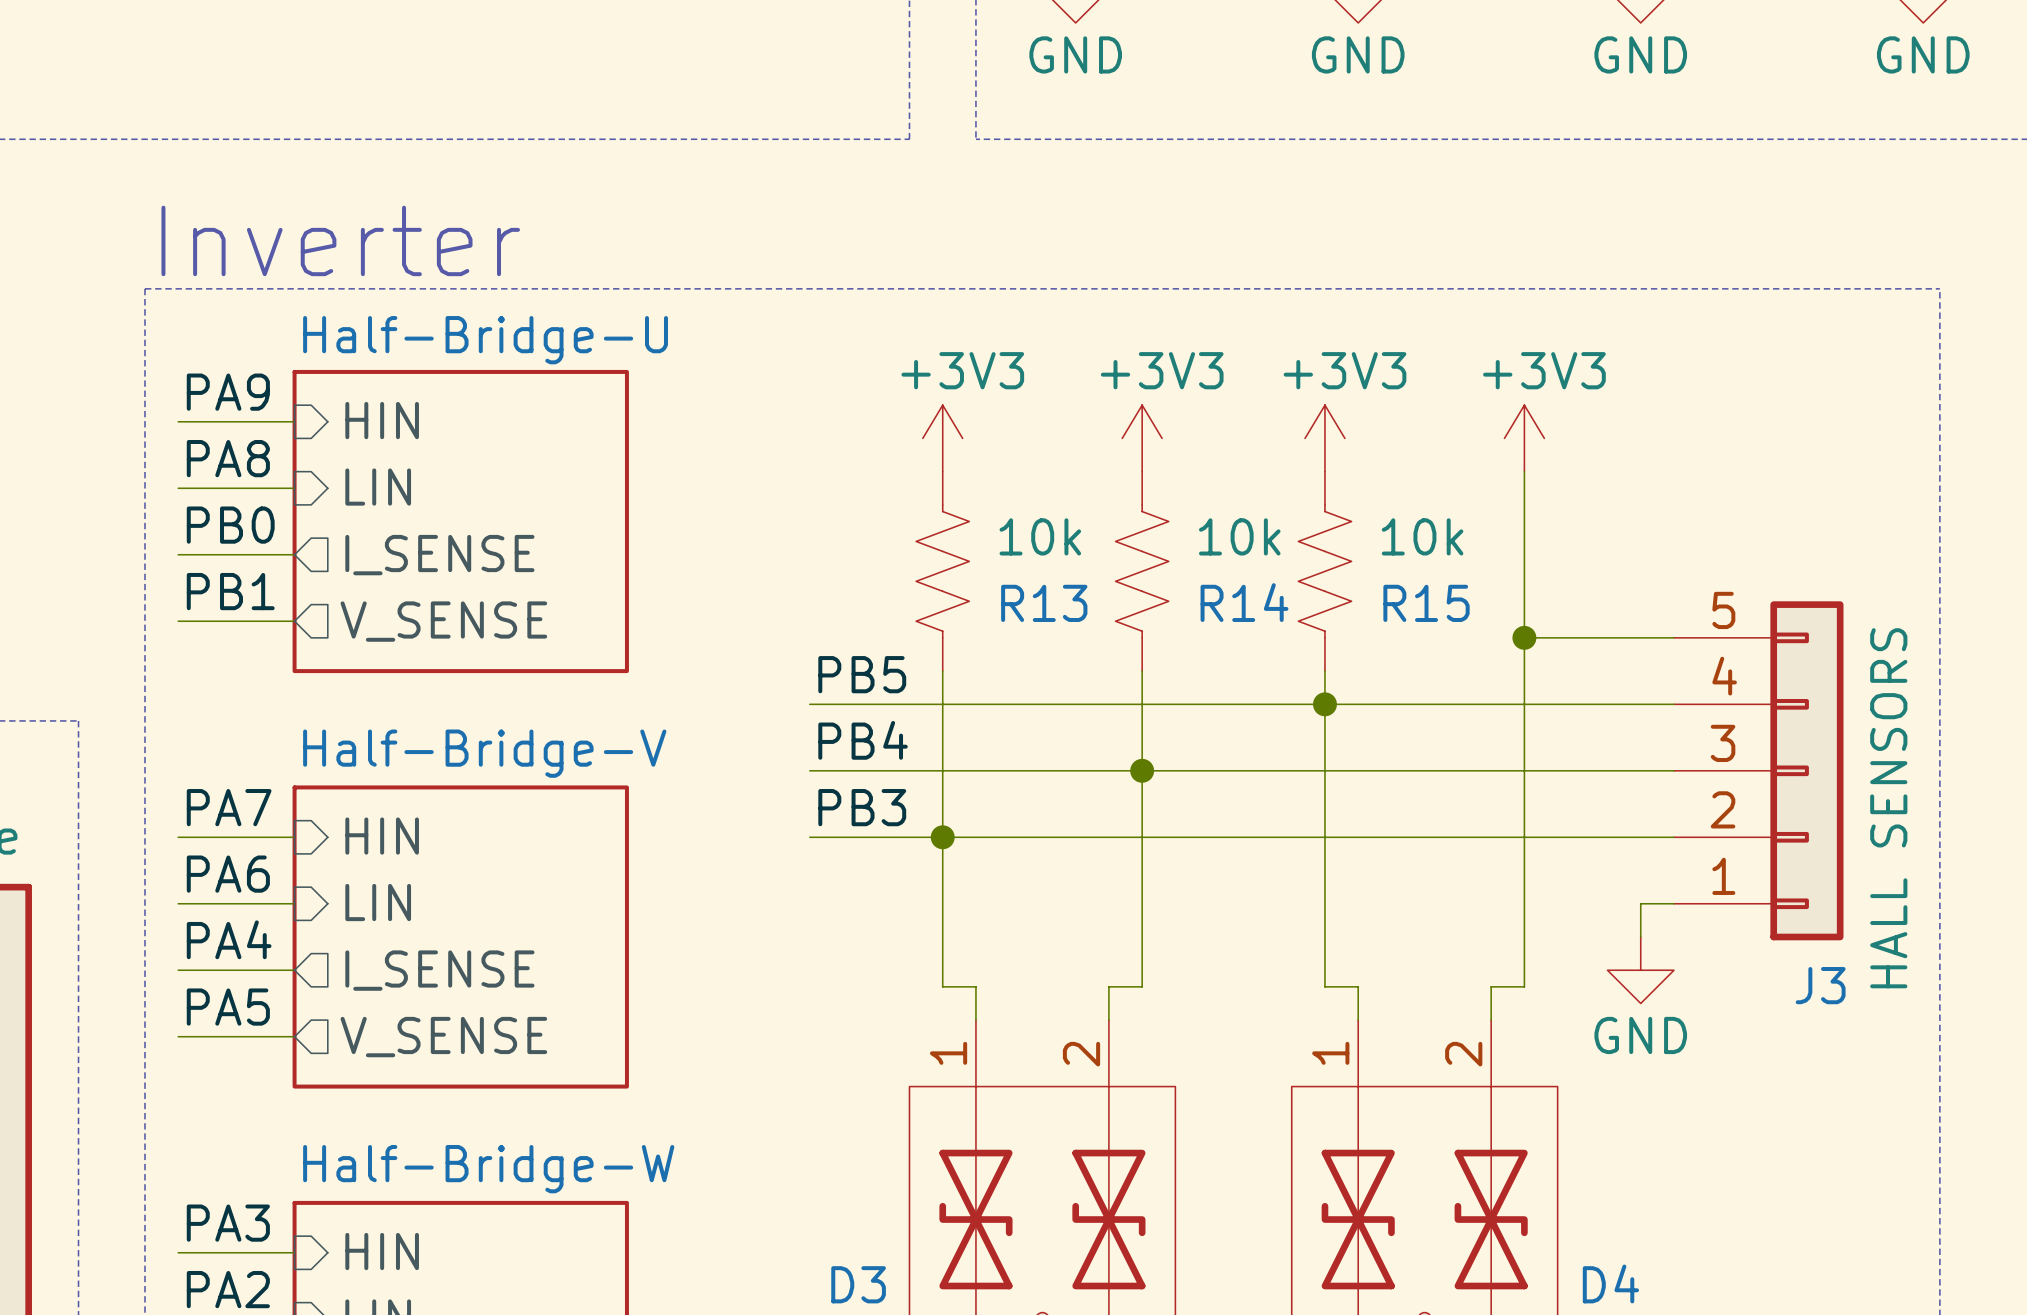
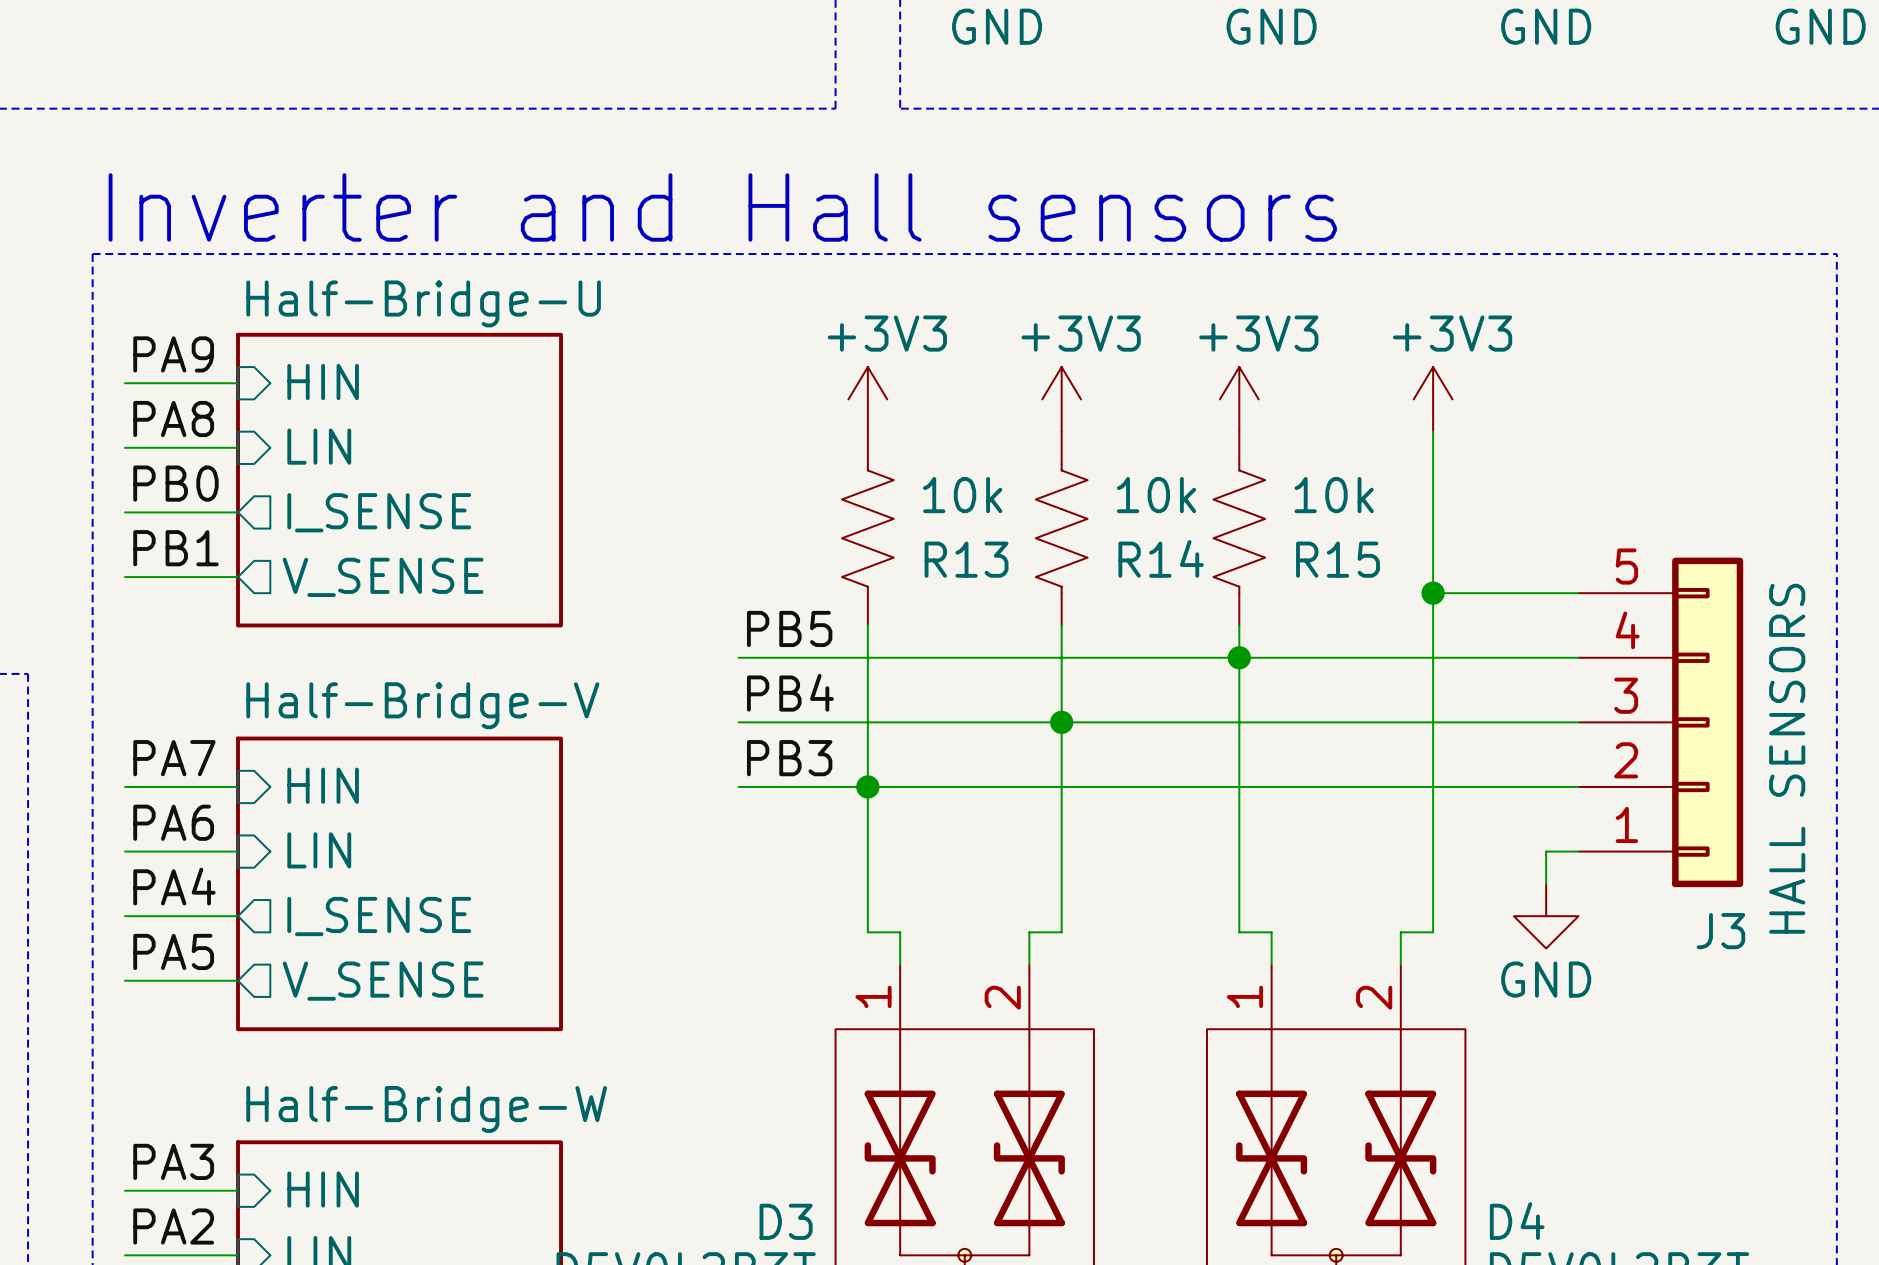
text: Inverter (340, 240) -> Inverter and Hall sensors (722, 207)

